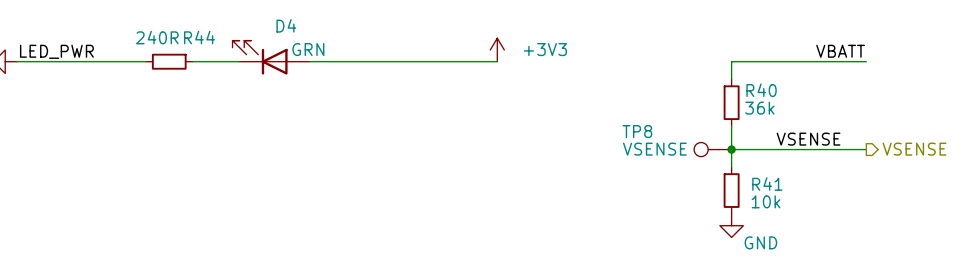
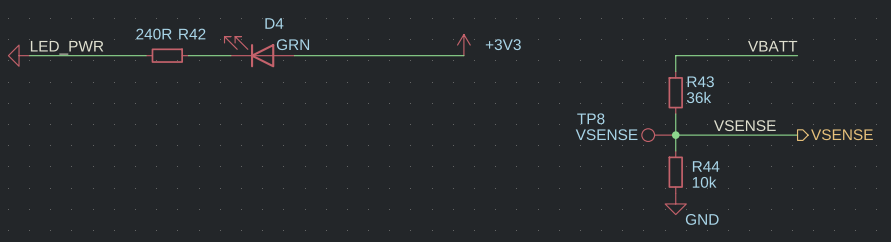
R44 name: R44 (199, 37) -> R42 (192, 34)
R40 name: R40 (761, 90) -> R43 (700, 81)
R41 name: R41 (767, 184) -> R44 (706, 166)

